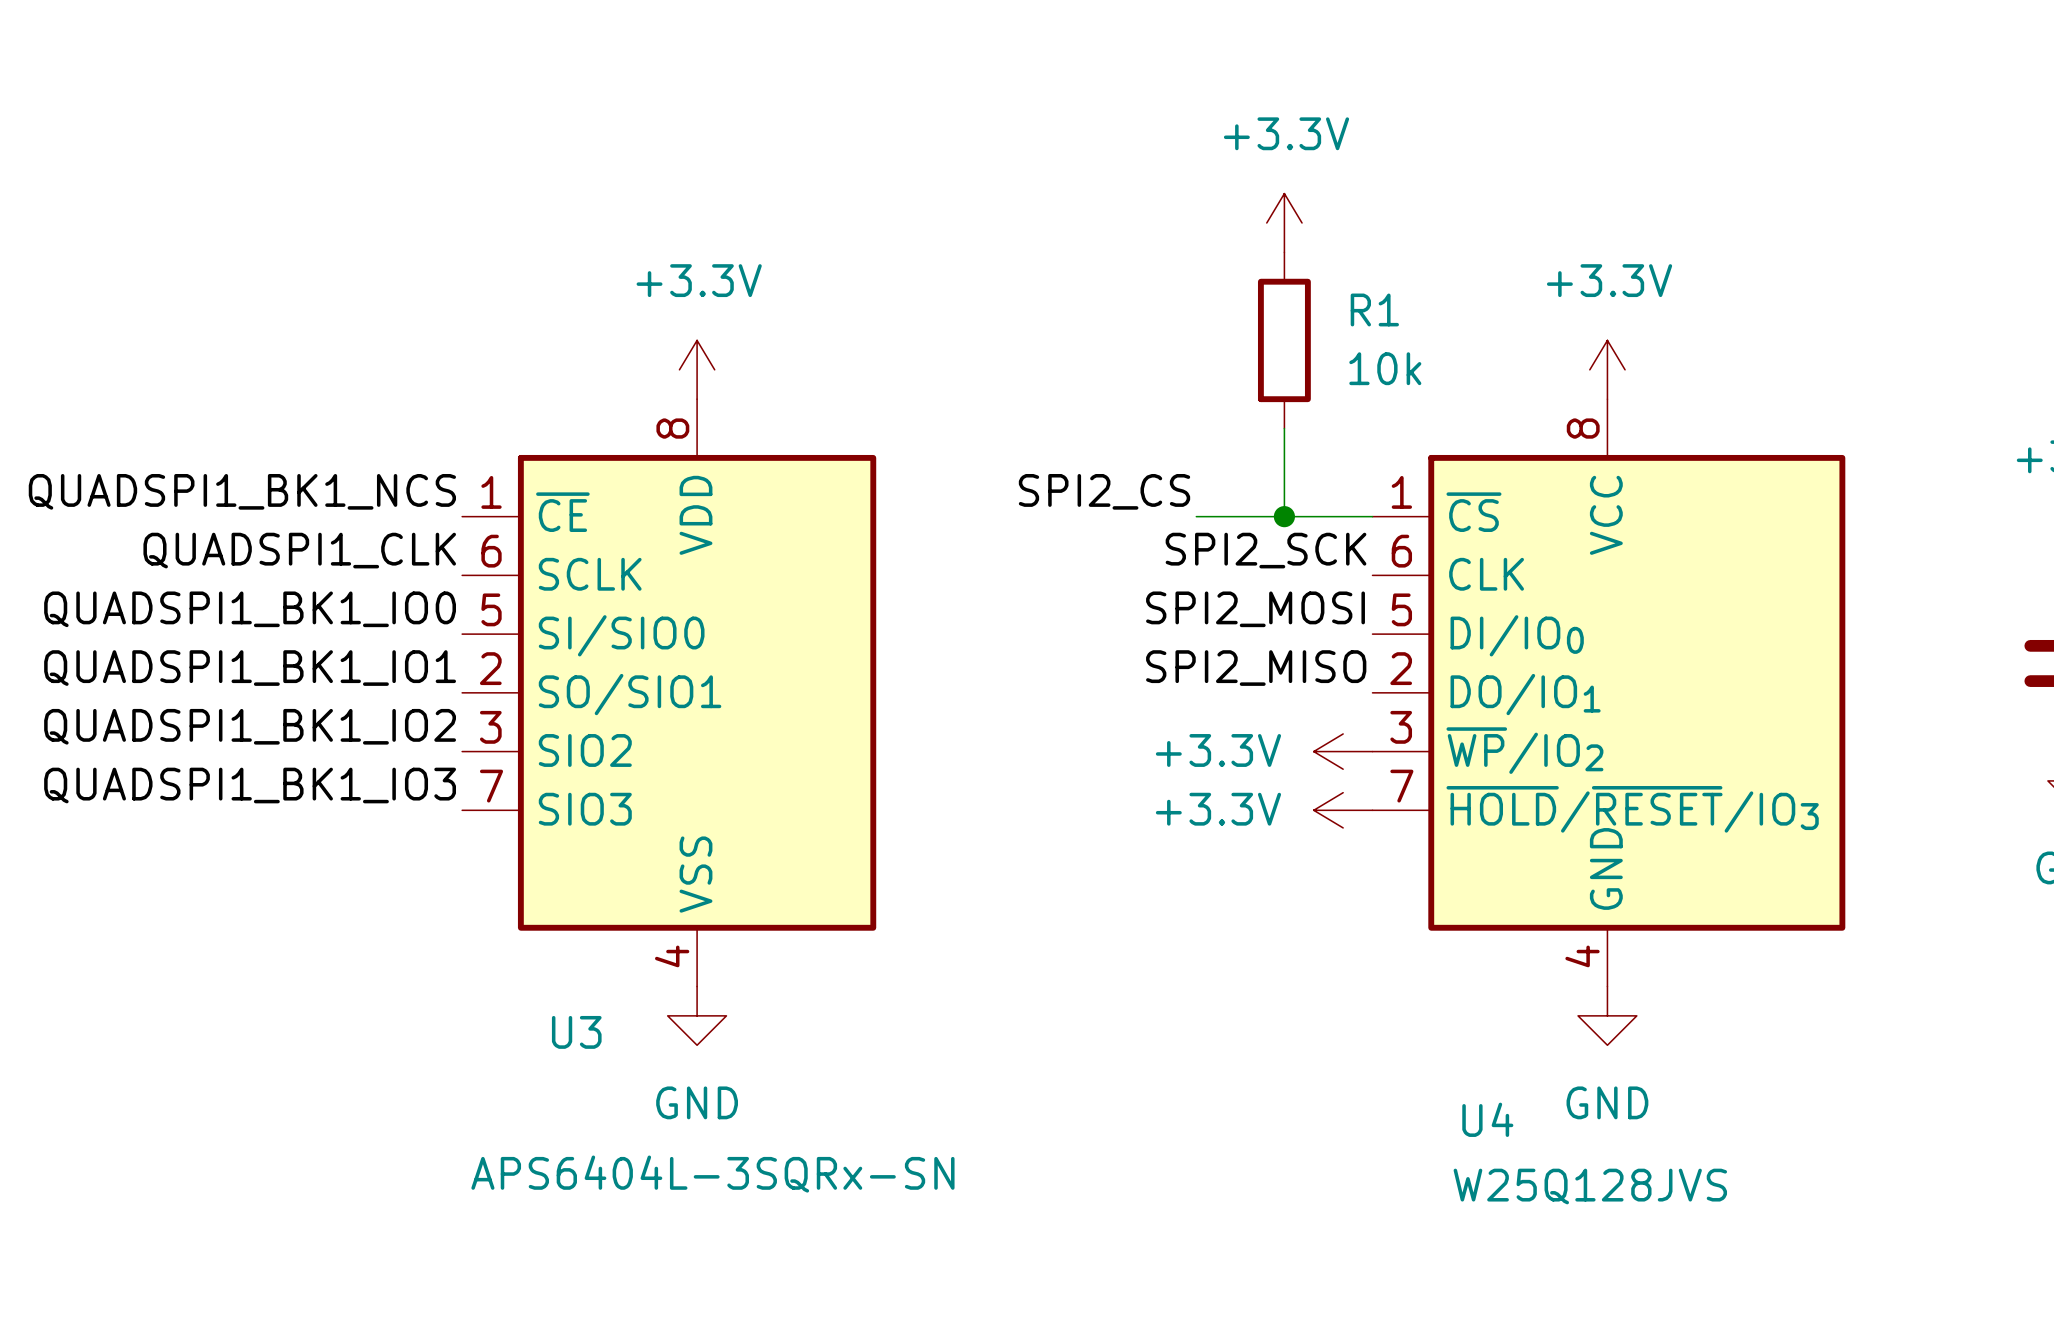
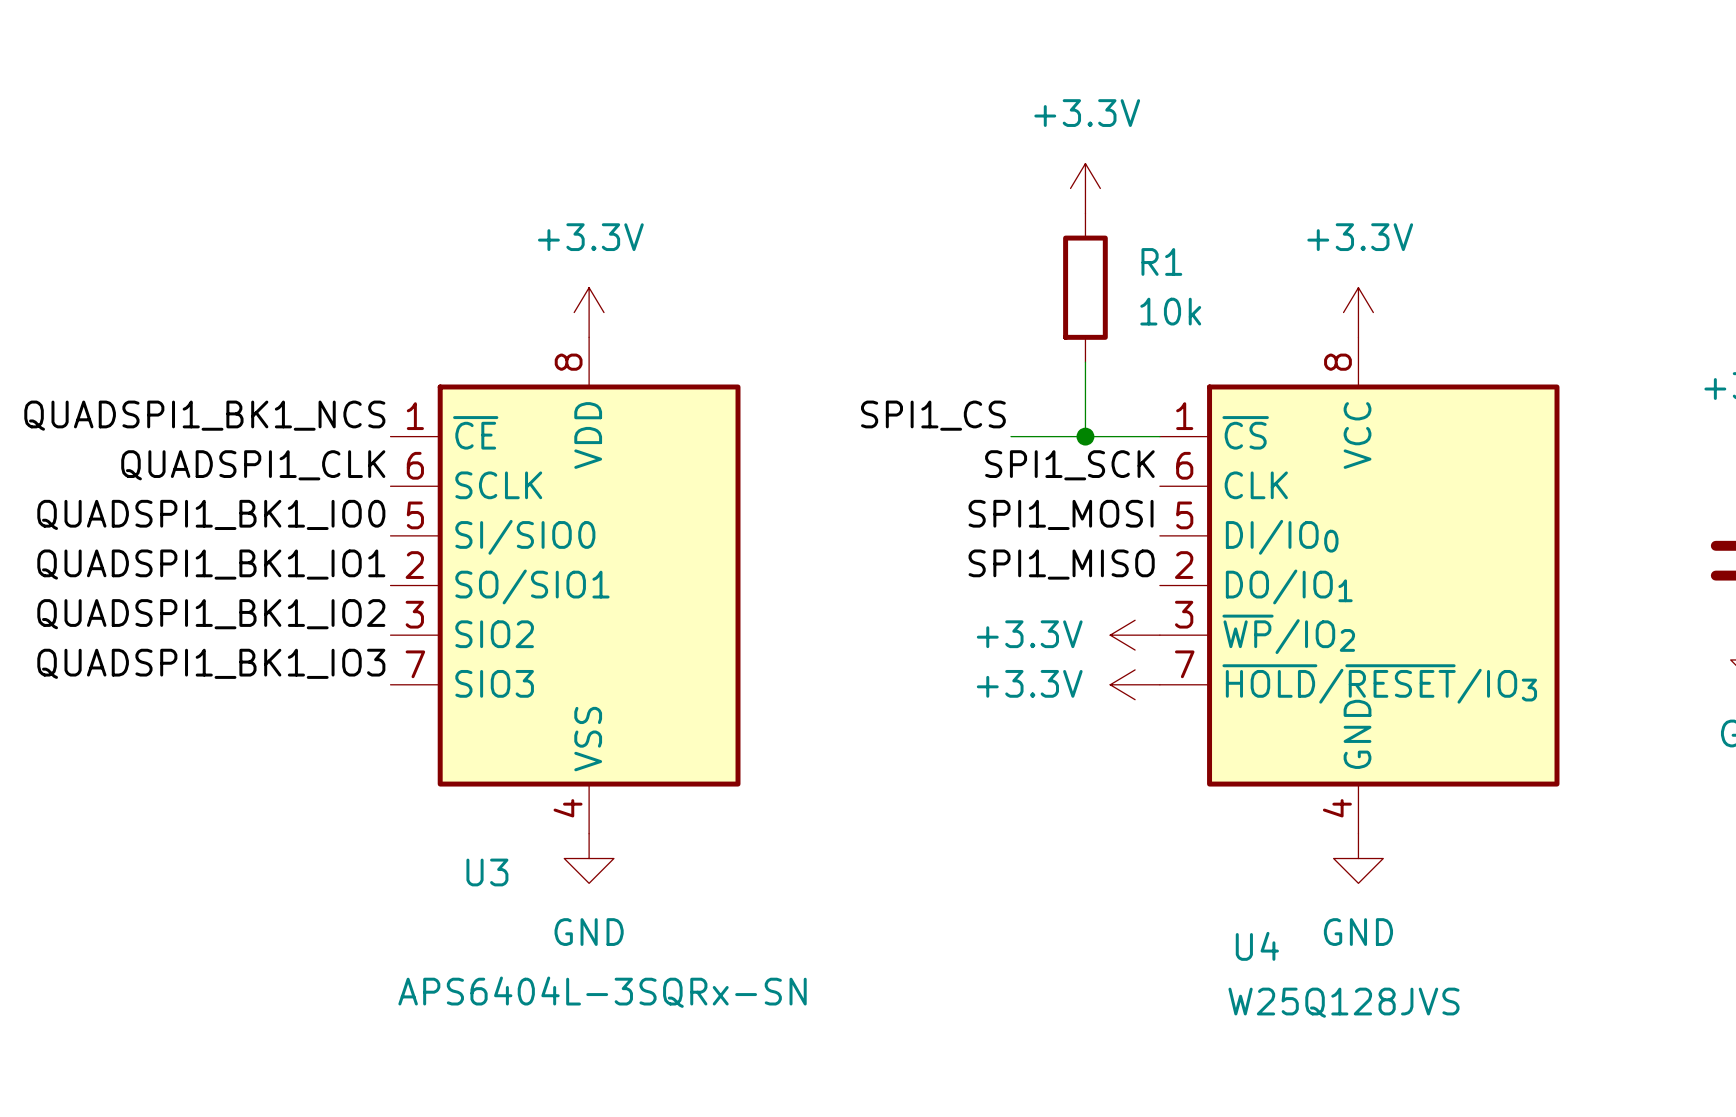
label: SPI2_CS (1104, 491) -> SPI1_CS (933, 415)
label: SPI2_SCK (1266, 550) -> SPI1_SCK (1069, 465)
label: SPI2_MOSI (1255, 609) -> SPI1_MOSI (1061, 514)
label: SPI2_MISO (1256, 668) -> SPI1_MISO (1061, 564)

